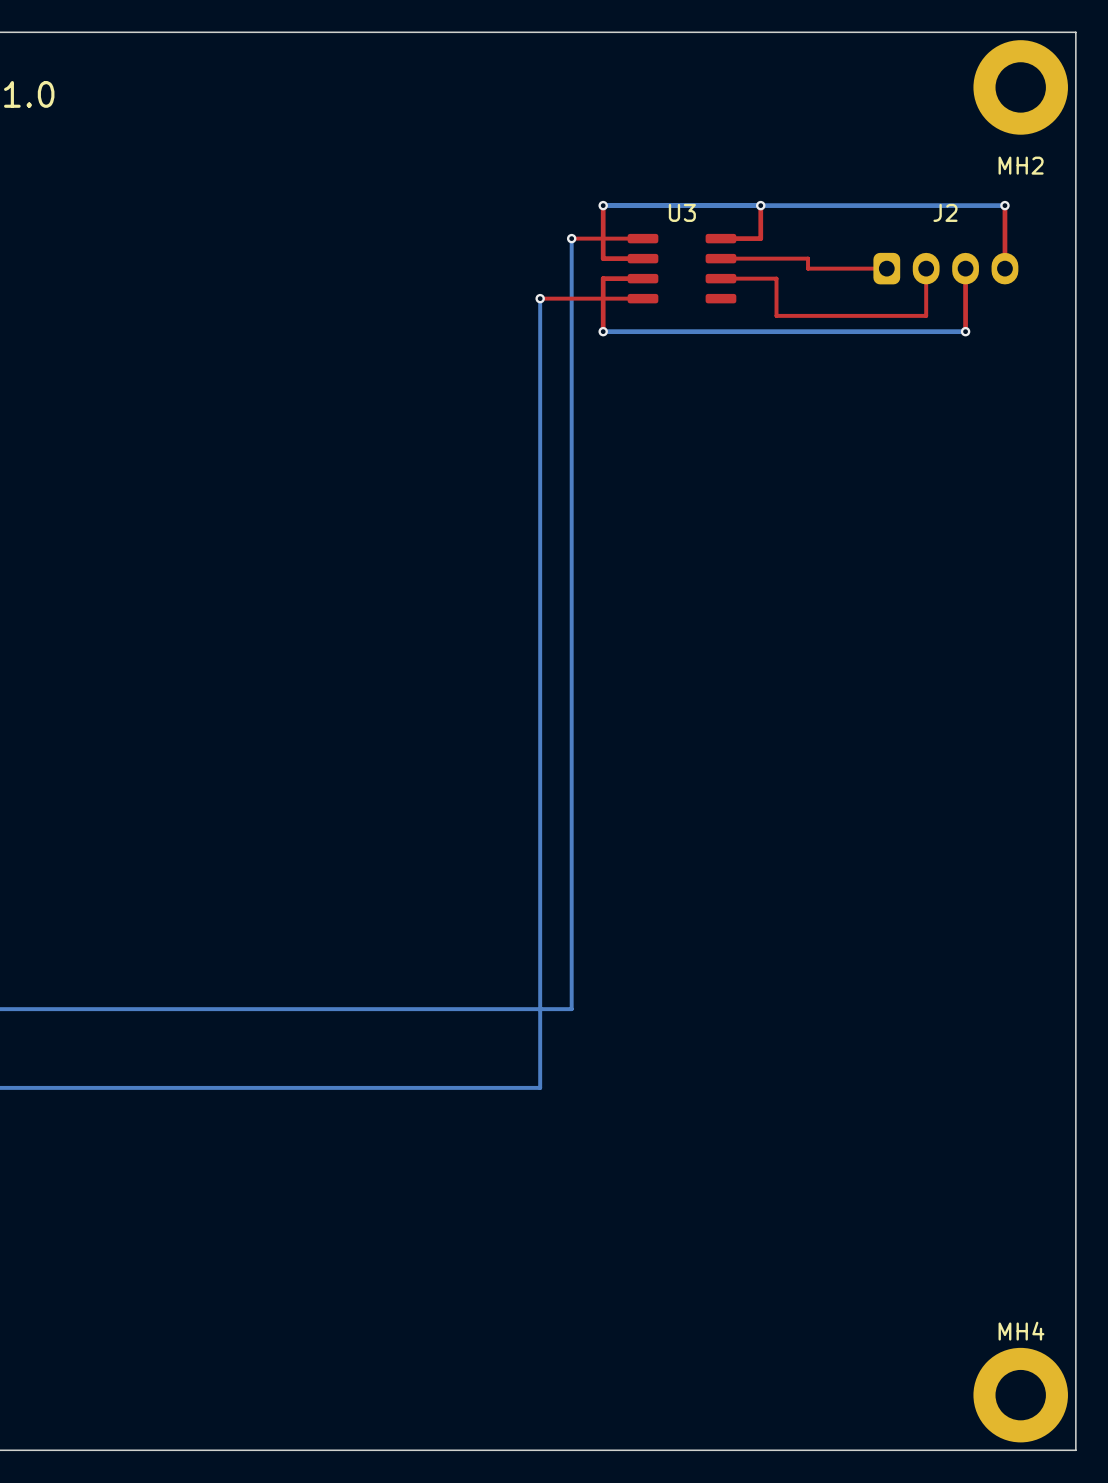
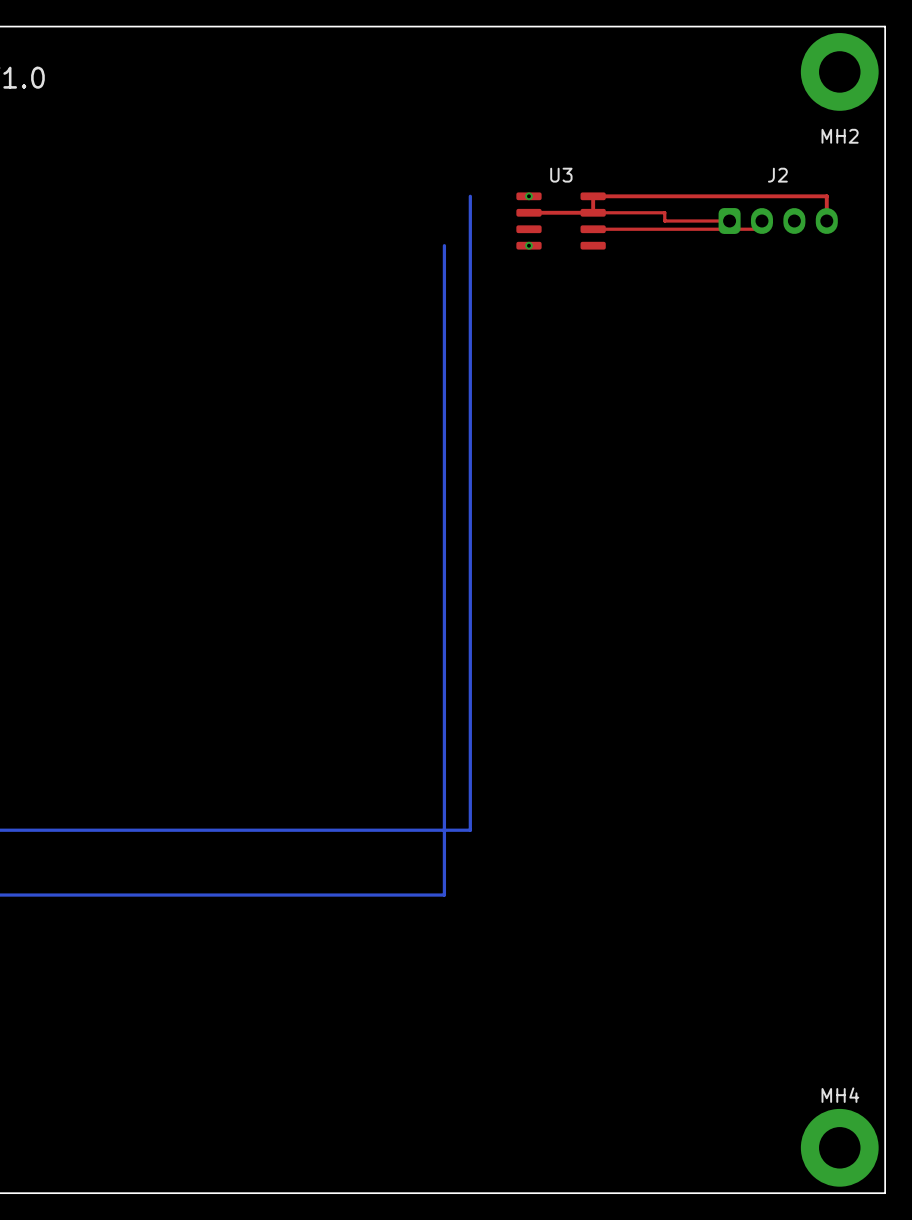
top track: (603, 205) (603, 258) (642, 258) -> (593, 196) (593, 212) (528, 212)
bottom track: (603, 205) (1004, 205) -> none
via: (603, 205) -> none
top track: (760, 205) (760, 238) -> (826, 196) (625, 196)
via: (760, 205) -> none
top track: (1004, 205) (1004, 238) -> none
via: (1004, 205) -> none
top track: (571, 238) (642, 238) -> none
via: (571, 238) -> none
via: none -> (528, 196)
top track: (965, 268) (965, 331) -> none
top track: (642, 278) (603, 278) (603, 331) -> none
top track: (776, 278) (776, 315) (926, 315) (926, 278) -> (638, 229) (761, 229)
top track: (540, 298) (642, 298) -> none
via: (540, 298) -> none
via: none -> (528, 245)
bottom track: (603, 331) (965, 331) -> none
via: (603, 331) -> none
via: (965, 331) -> none

